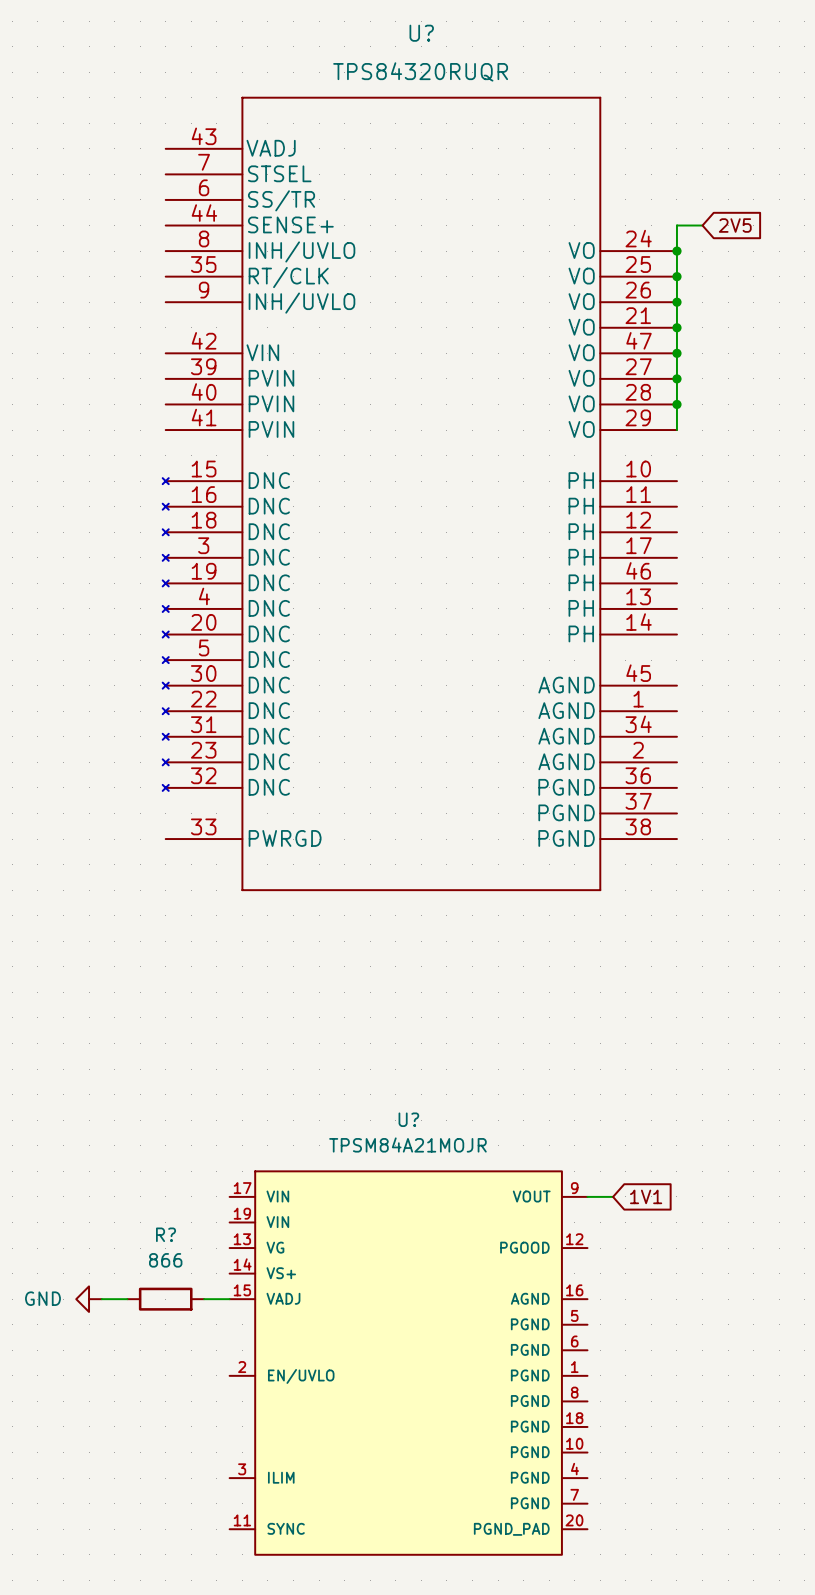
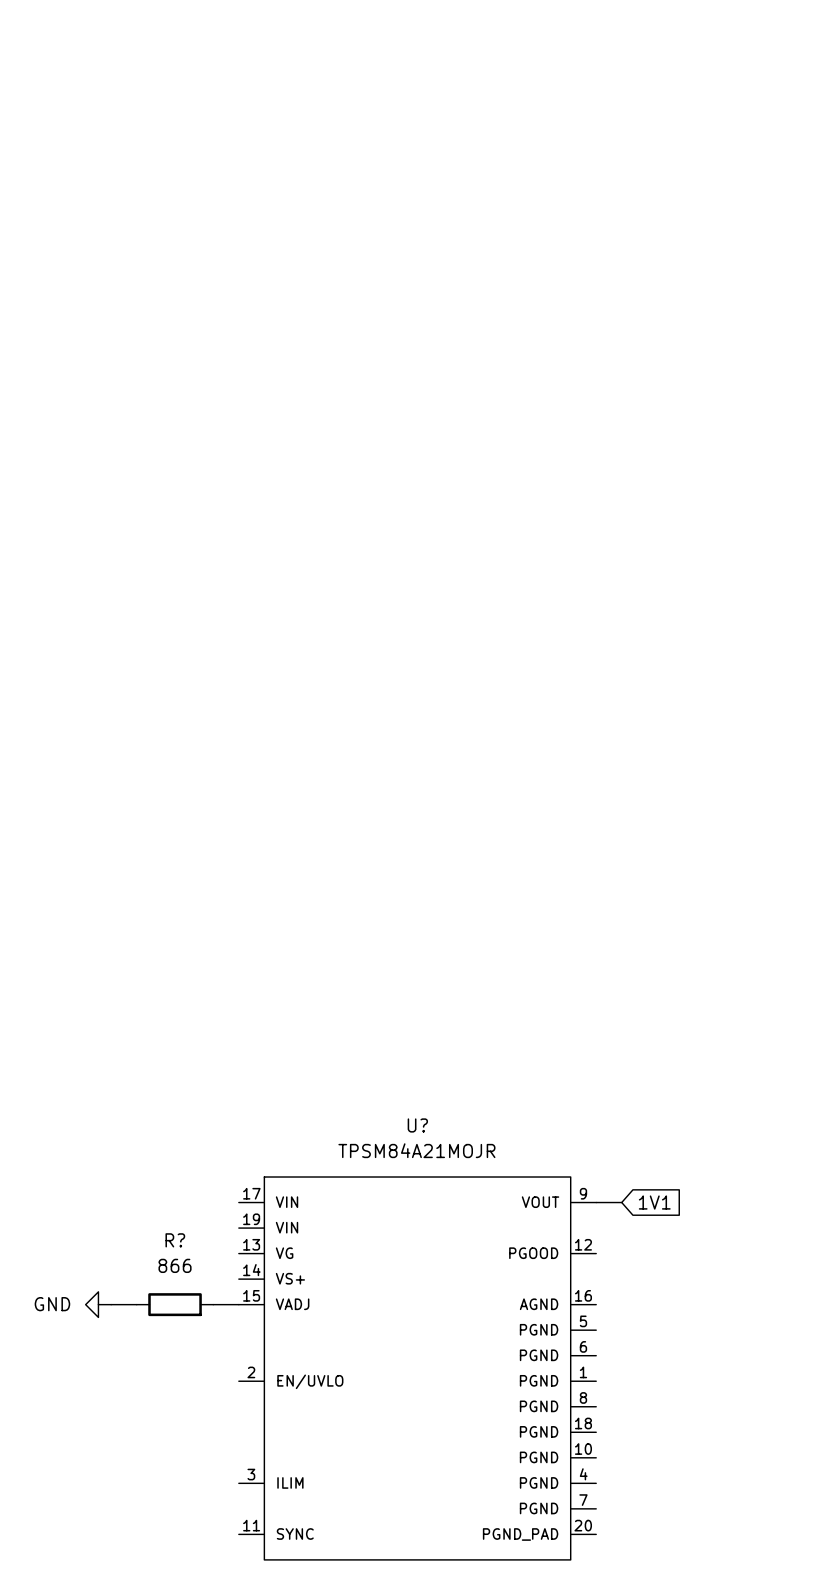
wire: (702, 225) (676, 225) (676, 430) -> none
global label: 2V5 (735, 225) -> none
junction: (676, 251) -> none
junction: (676, 276) -> none
junction: (676, 302) -> none
junction: (676, 327) -> none
junction: (676, 353) -> none
junction: (676, 378) -> none
junction: (676, 404) -> none
U?: TPS84320RUQR (419, 493) -> none

